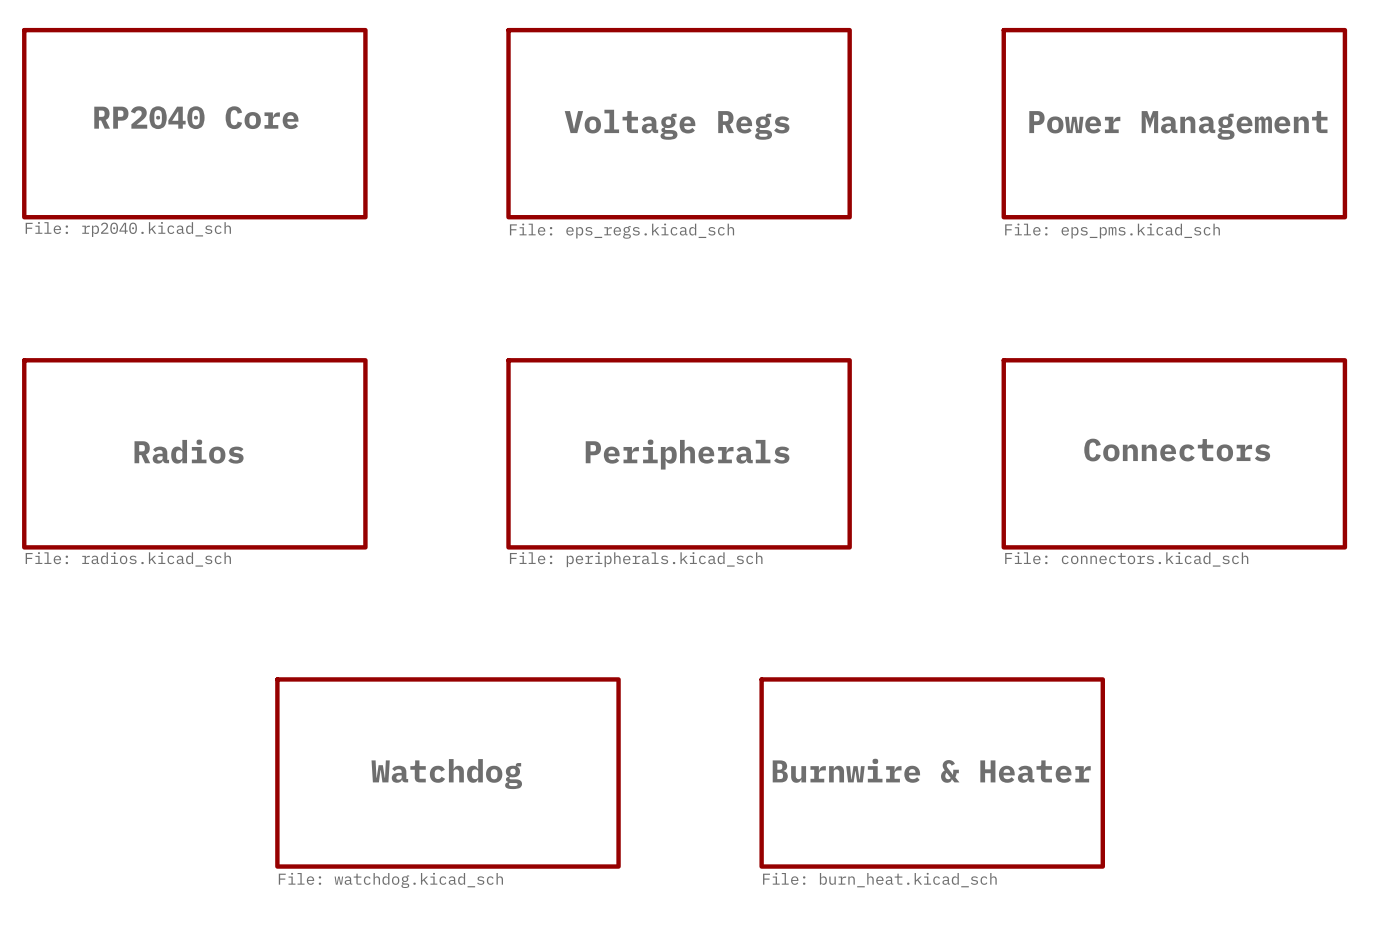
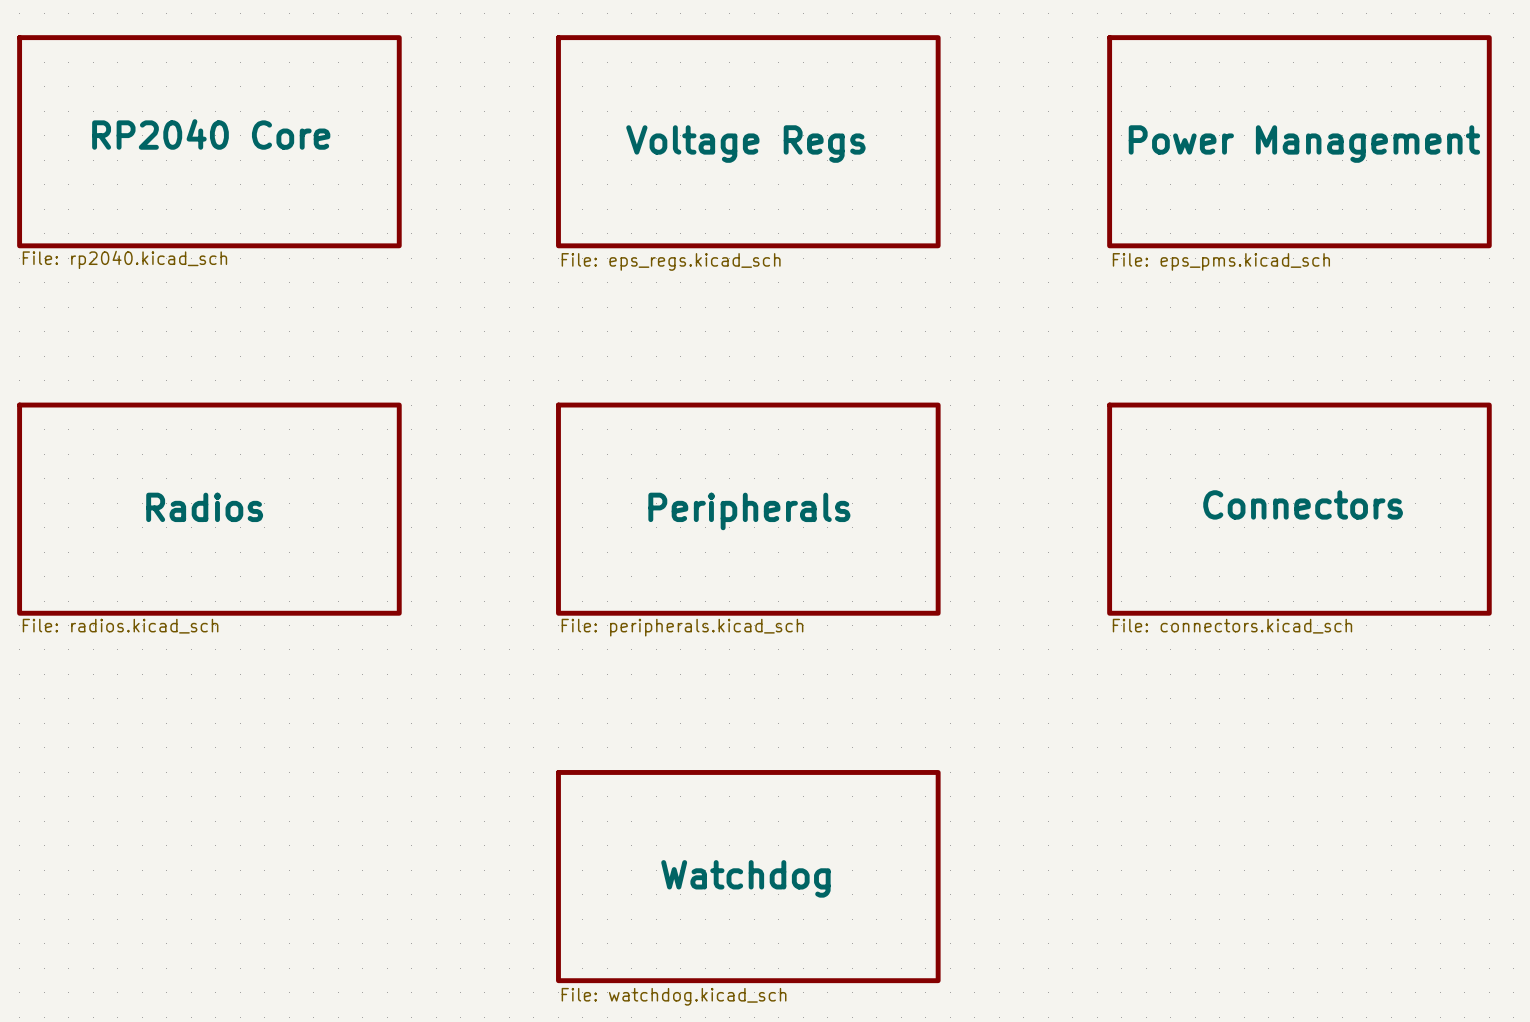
sheet Watchdog: File: watchdog.kicad_sch (447, 772) -> none
sheet Burnwire & Heater: File: burn_heat.kicad_sch (932, 772) -> none
sheet Watchdog: none -> File: watchdog.kicad_sch (748, 876)

